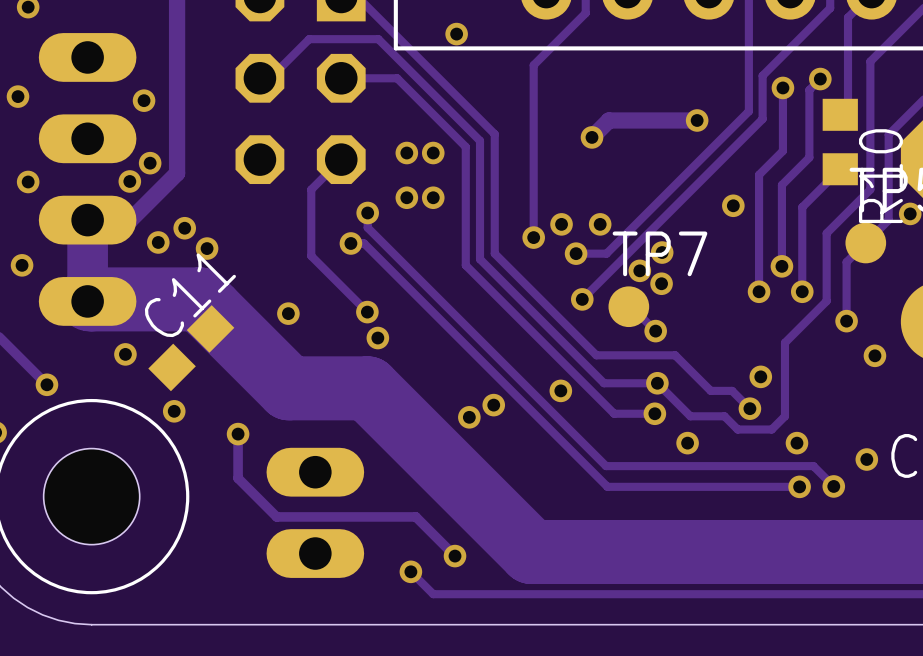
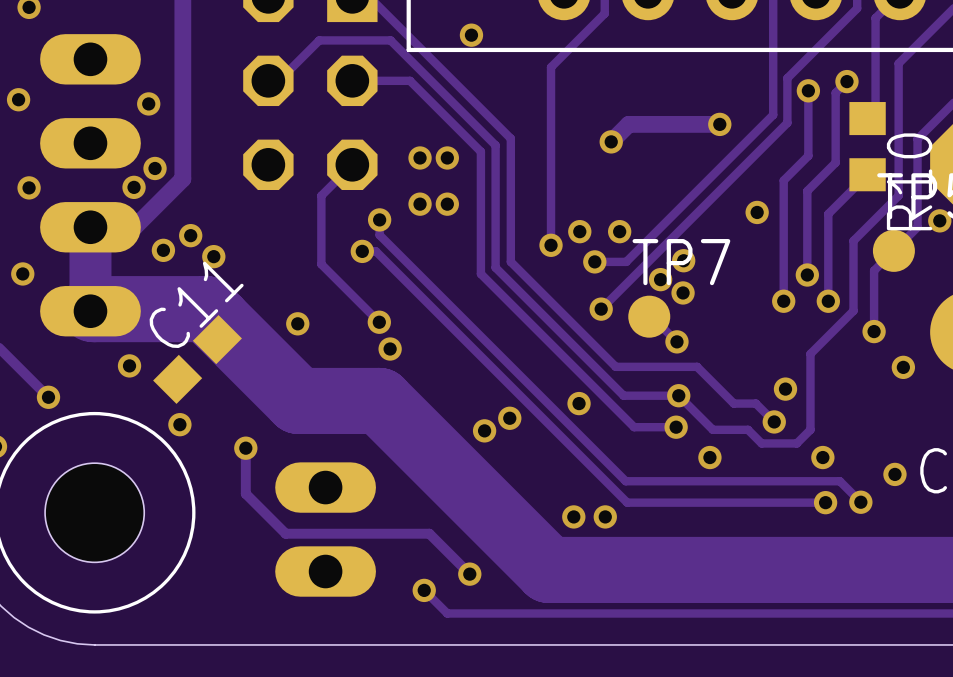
via: none -> (573, 516)
via: none -> (605, 516)

